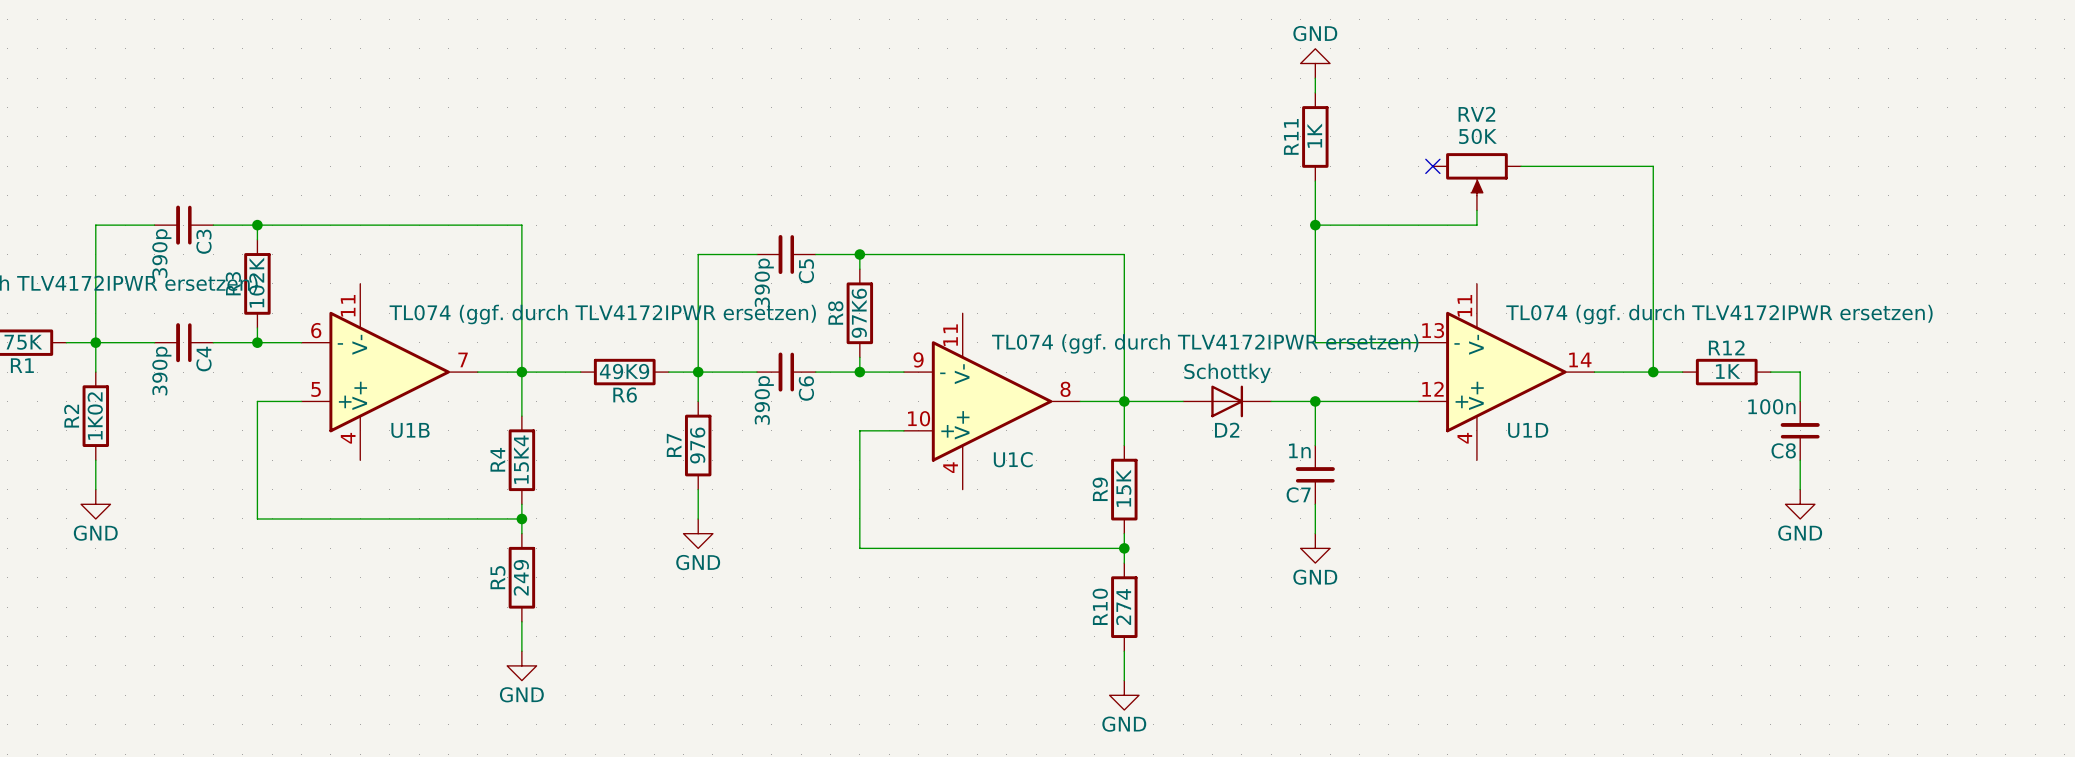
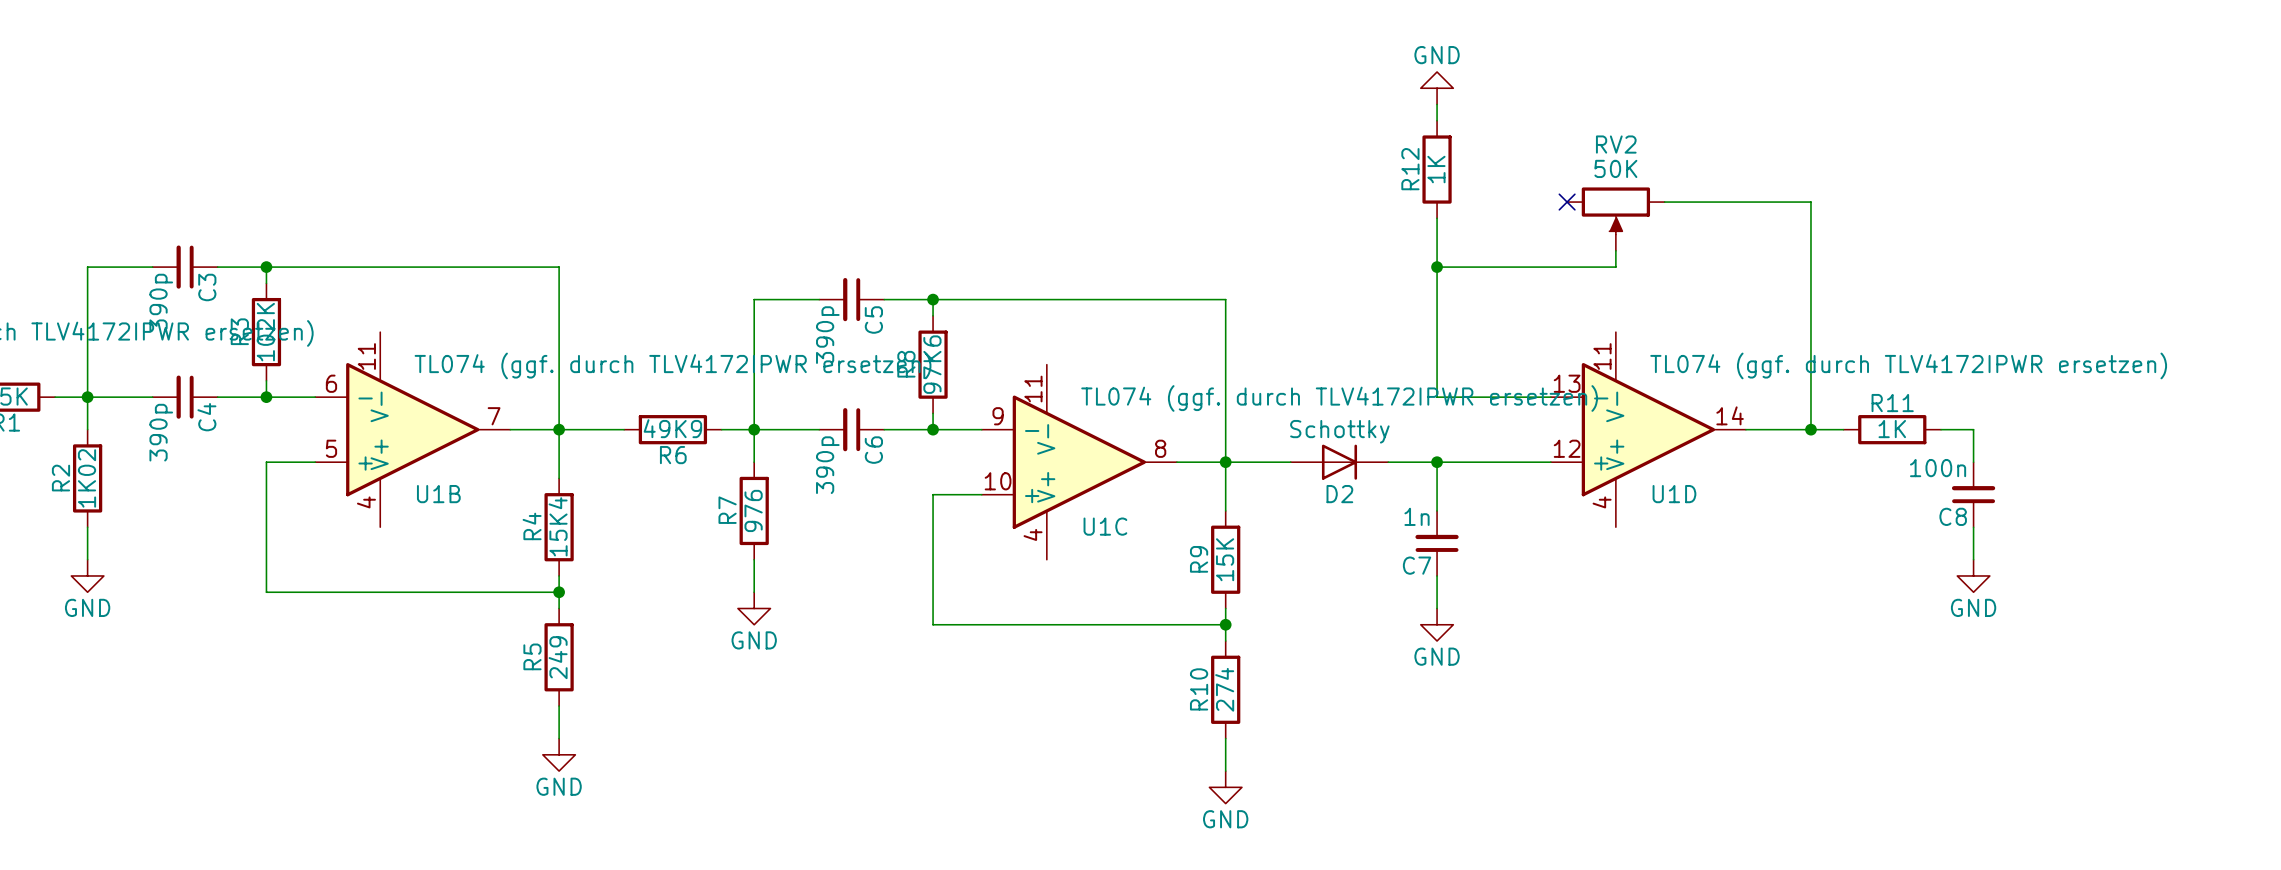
R11 name: R11 (1291, 136) -> R12 (1410, 169)
R12 name: R12 (1726, 347) -> R11 (1892, 403)

